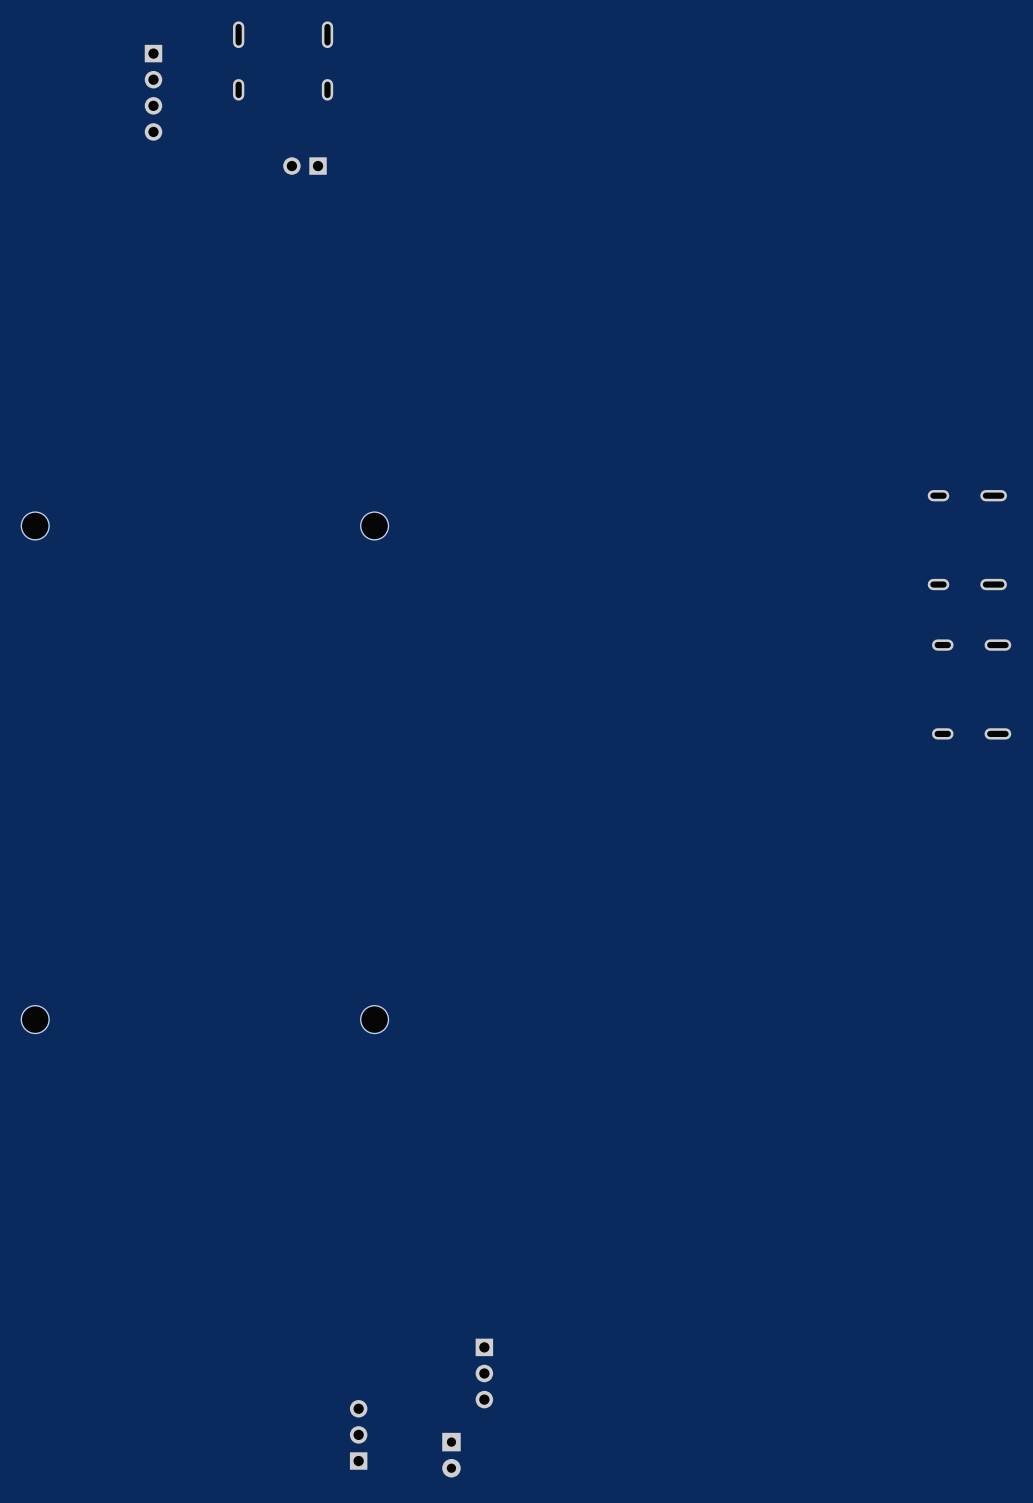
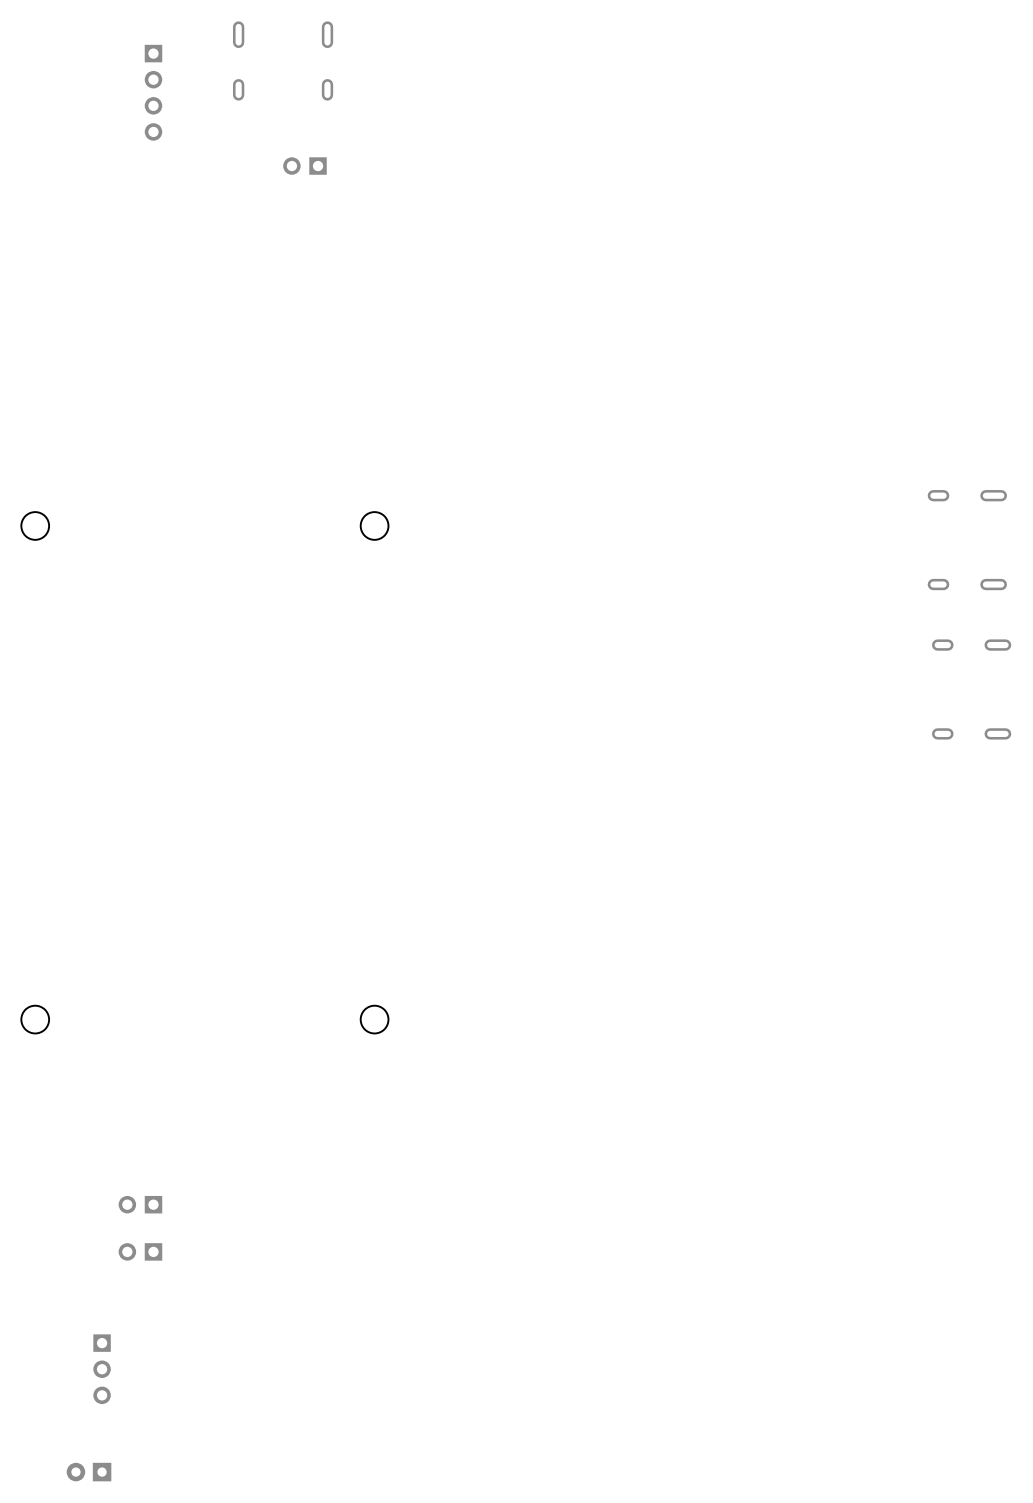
part: none -> (140, 1204)
part: none -> (140, 1251)
part: none -> (102, 1369)
part: (484, 1373) -> none
part: (358, 1434) -> none
part: (451, 1455) -> none
part: none -> (89, 1472)

